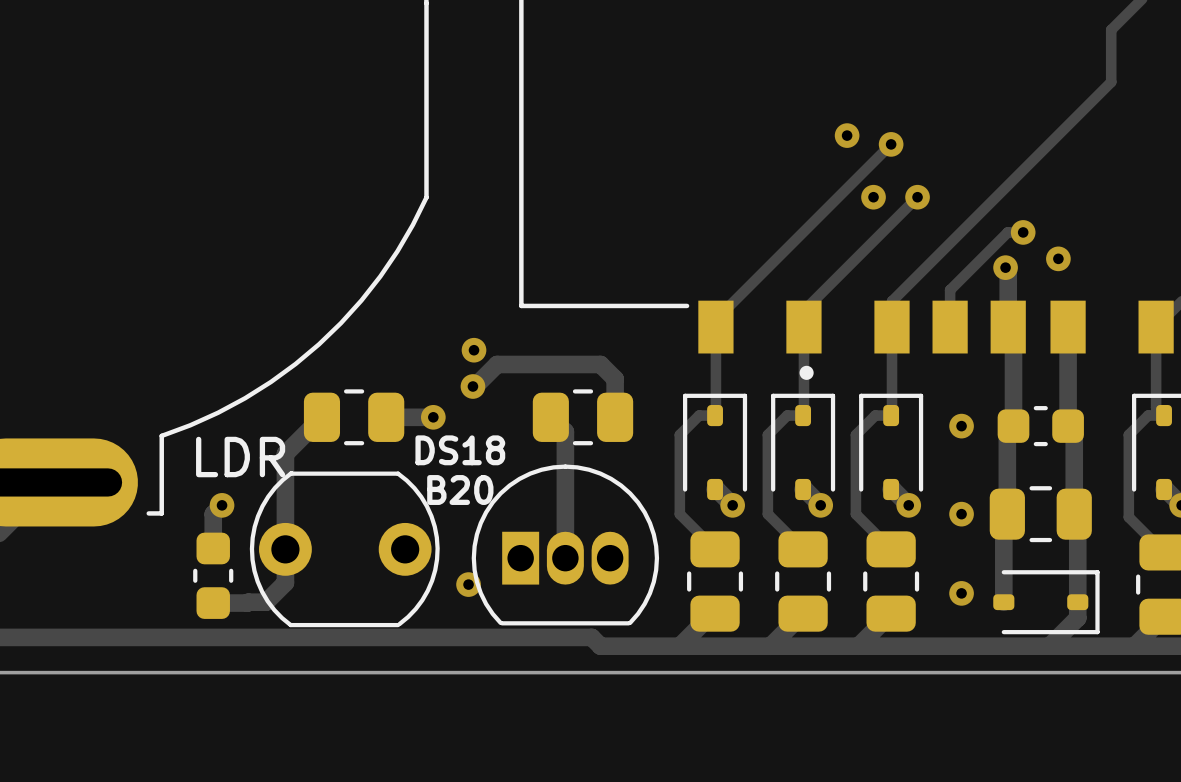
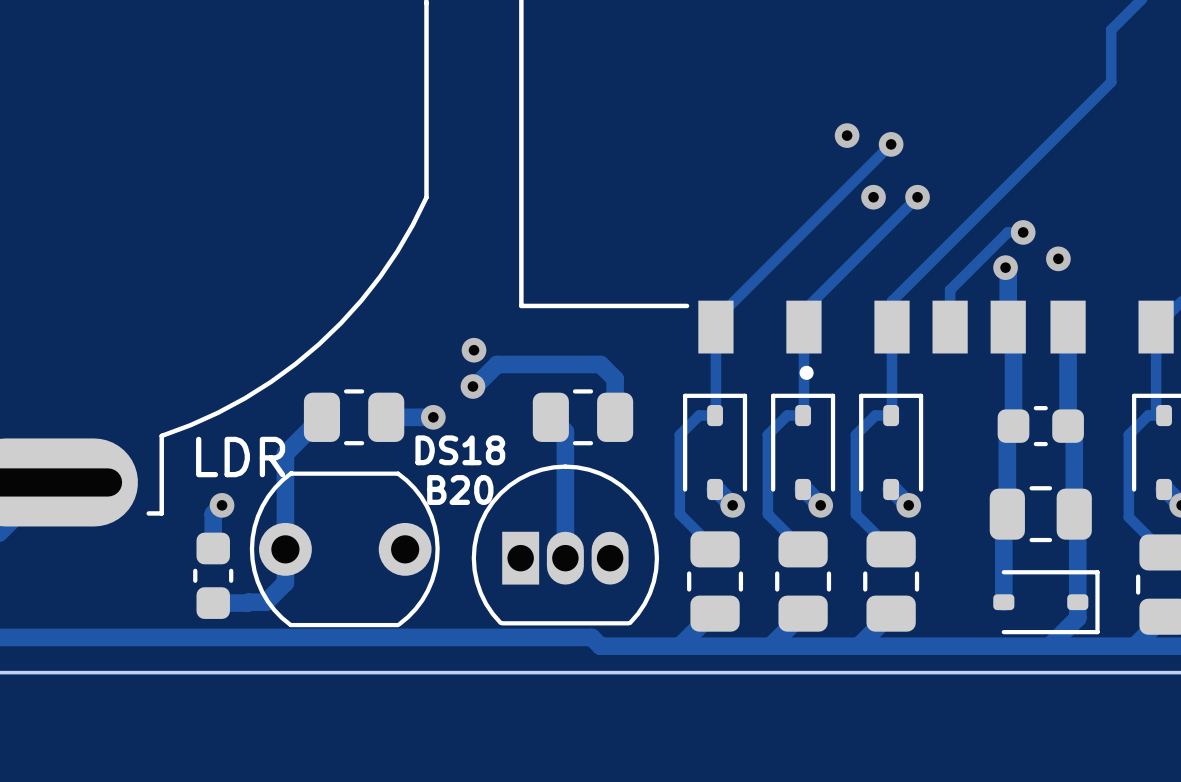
via: (961, 426) -> none
via: (961, 514) -> none
via: (468, 584) -> none
via: (961, 593) -> none

